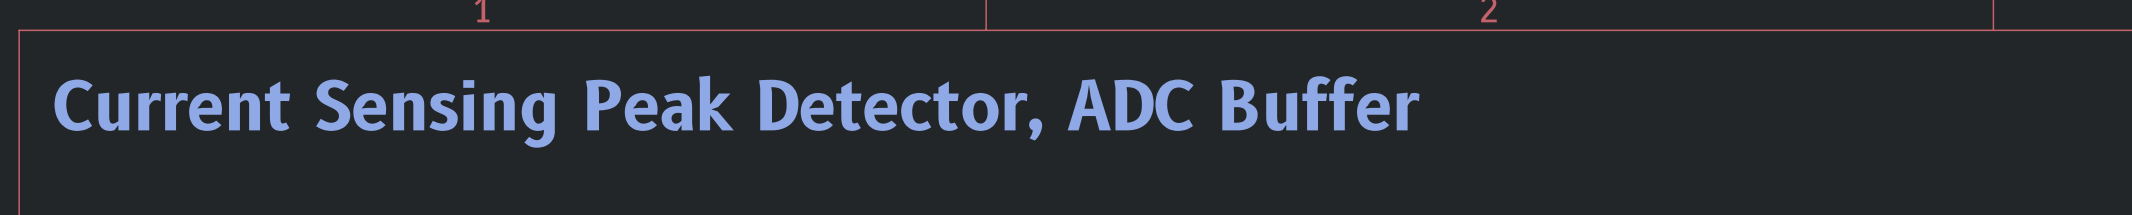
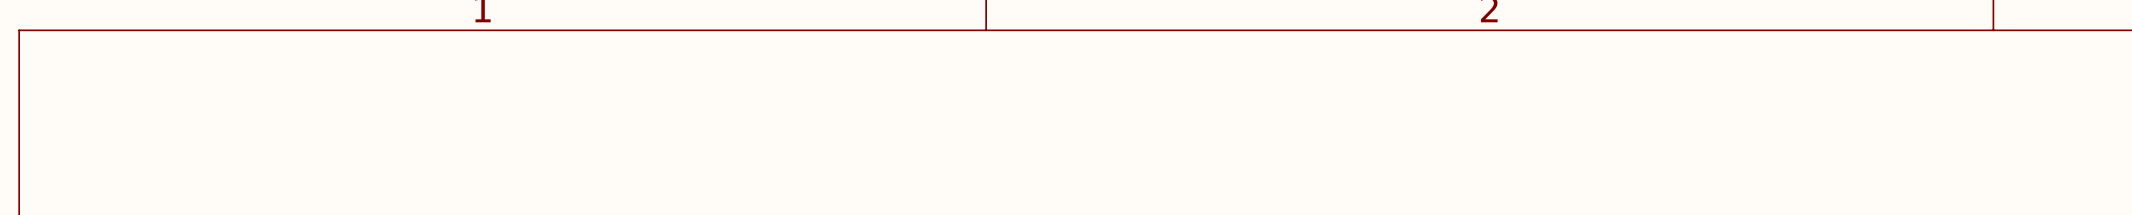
text: Current Sensing Peak Detector, ADC Buffer (737, 111) -> none

